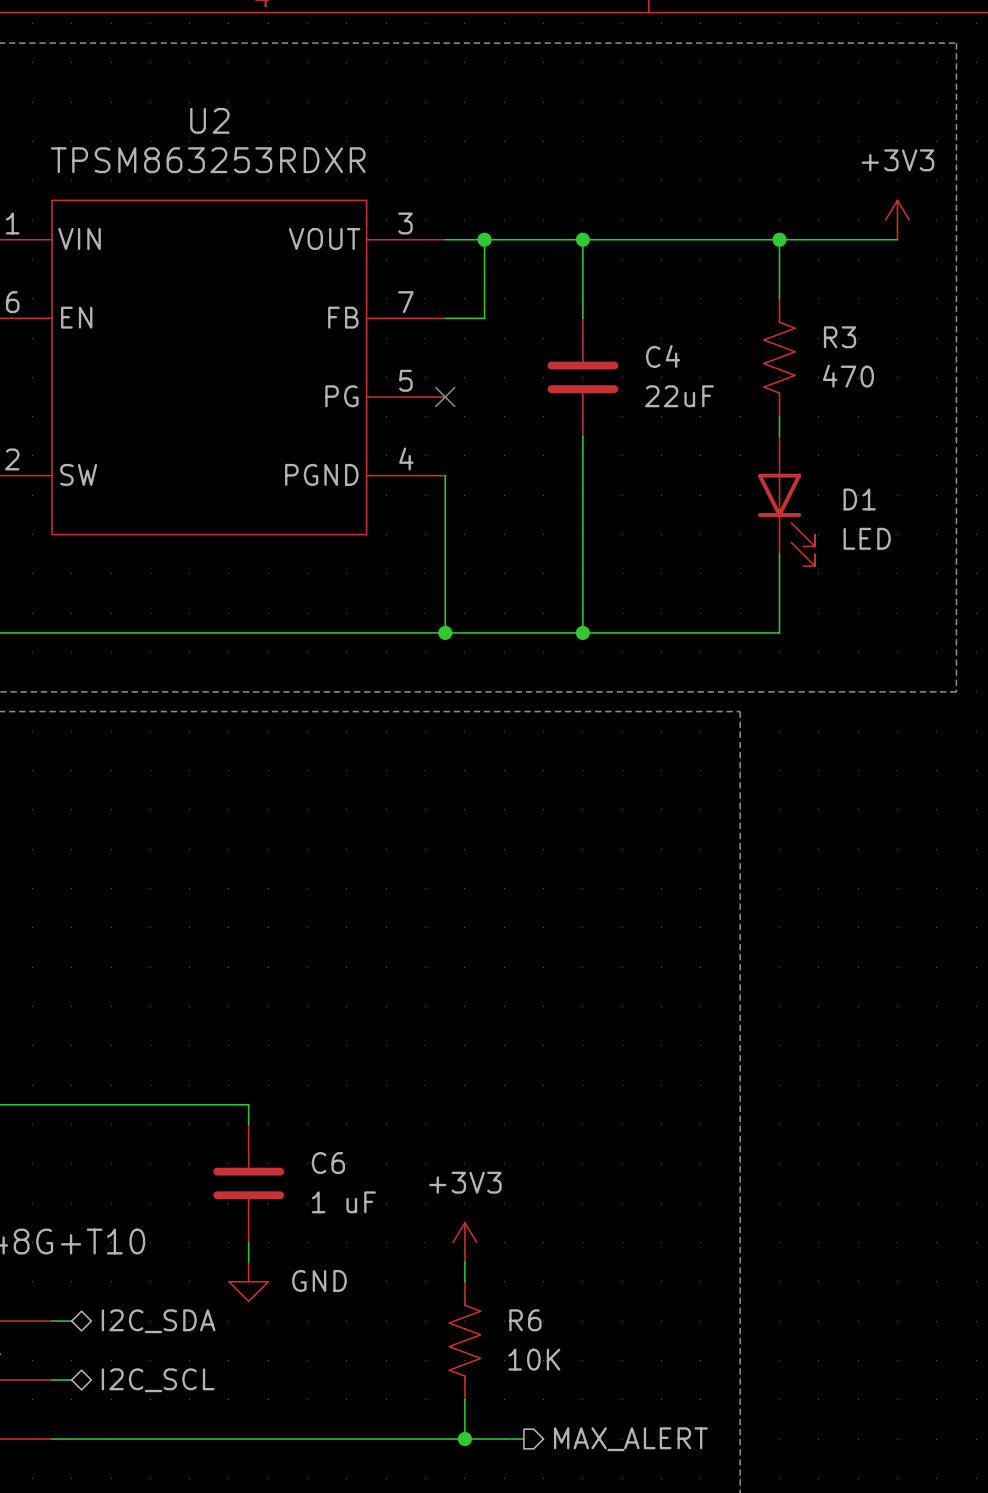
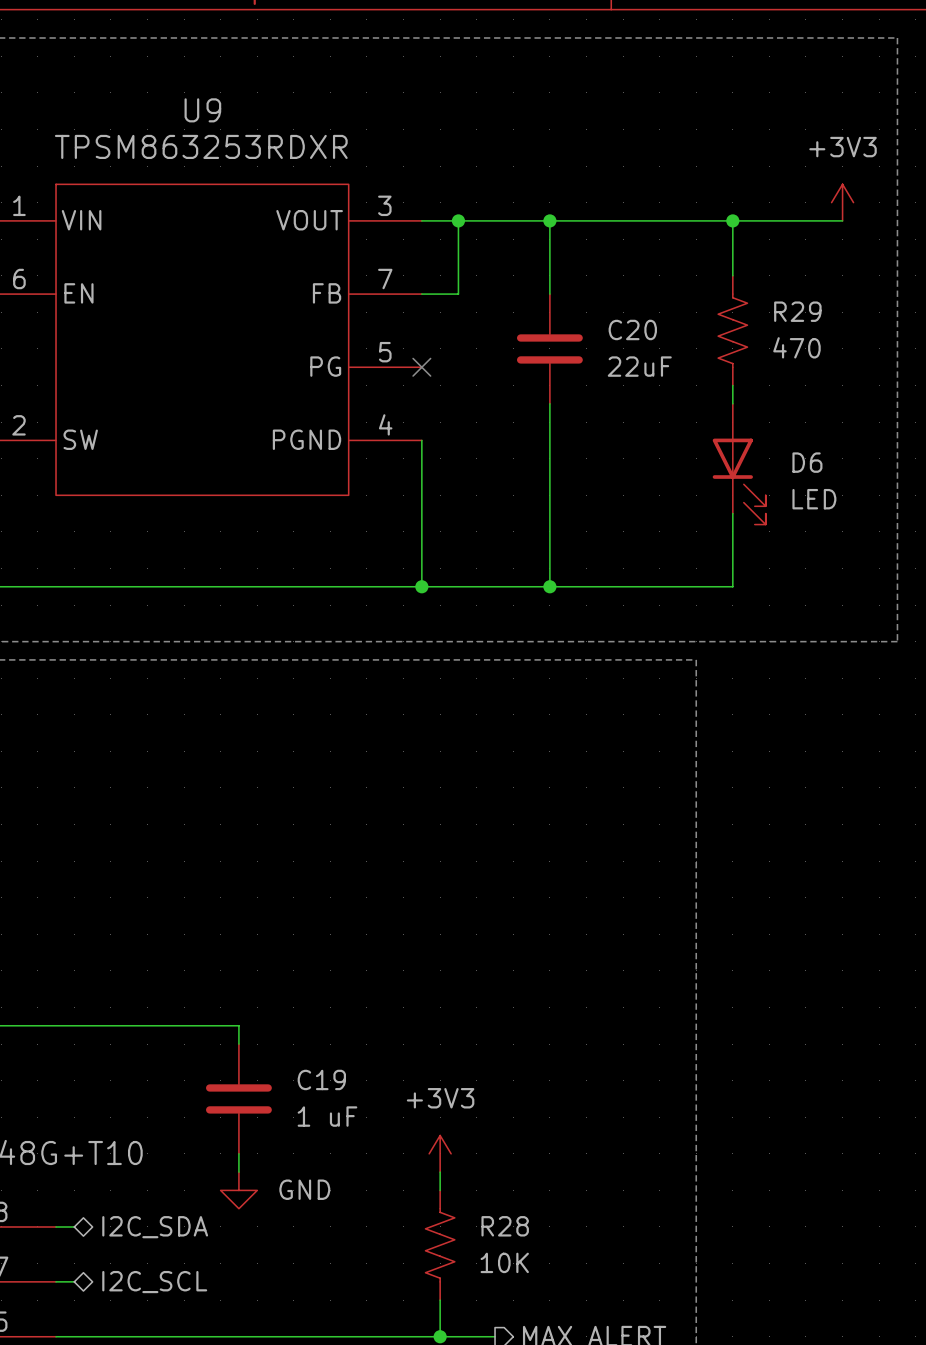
U2 name: U2 (209, 120) -> U9 (202, 110)
R3 name: R3 (840, 337) -> R29 (797, 311)
C4 name: C4 (663, 356) -> C20 (632, 329)
D1 name: D1 (859, 499) -> D6 (807, 462)
C6 name: C6 (328, 1163) -> C19 (321, 1079)
R6 name: R6 (525, 1320) -> R28 (505, 1226)

